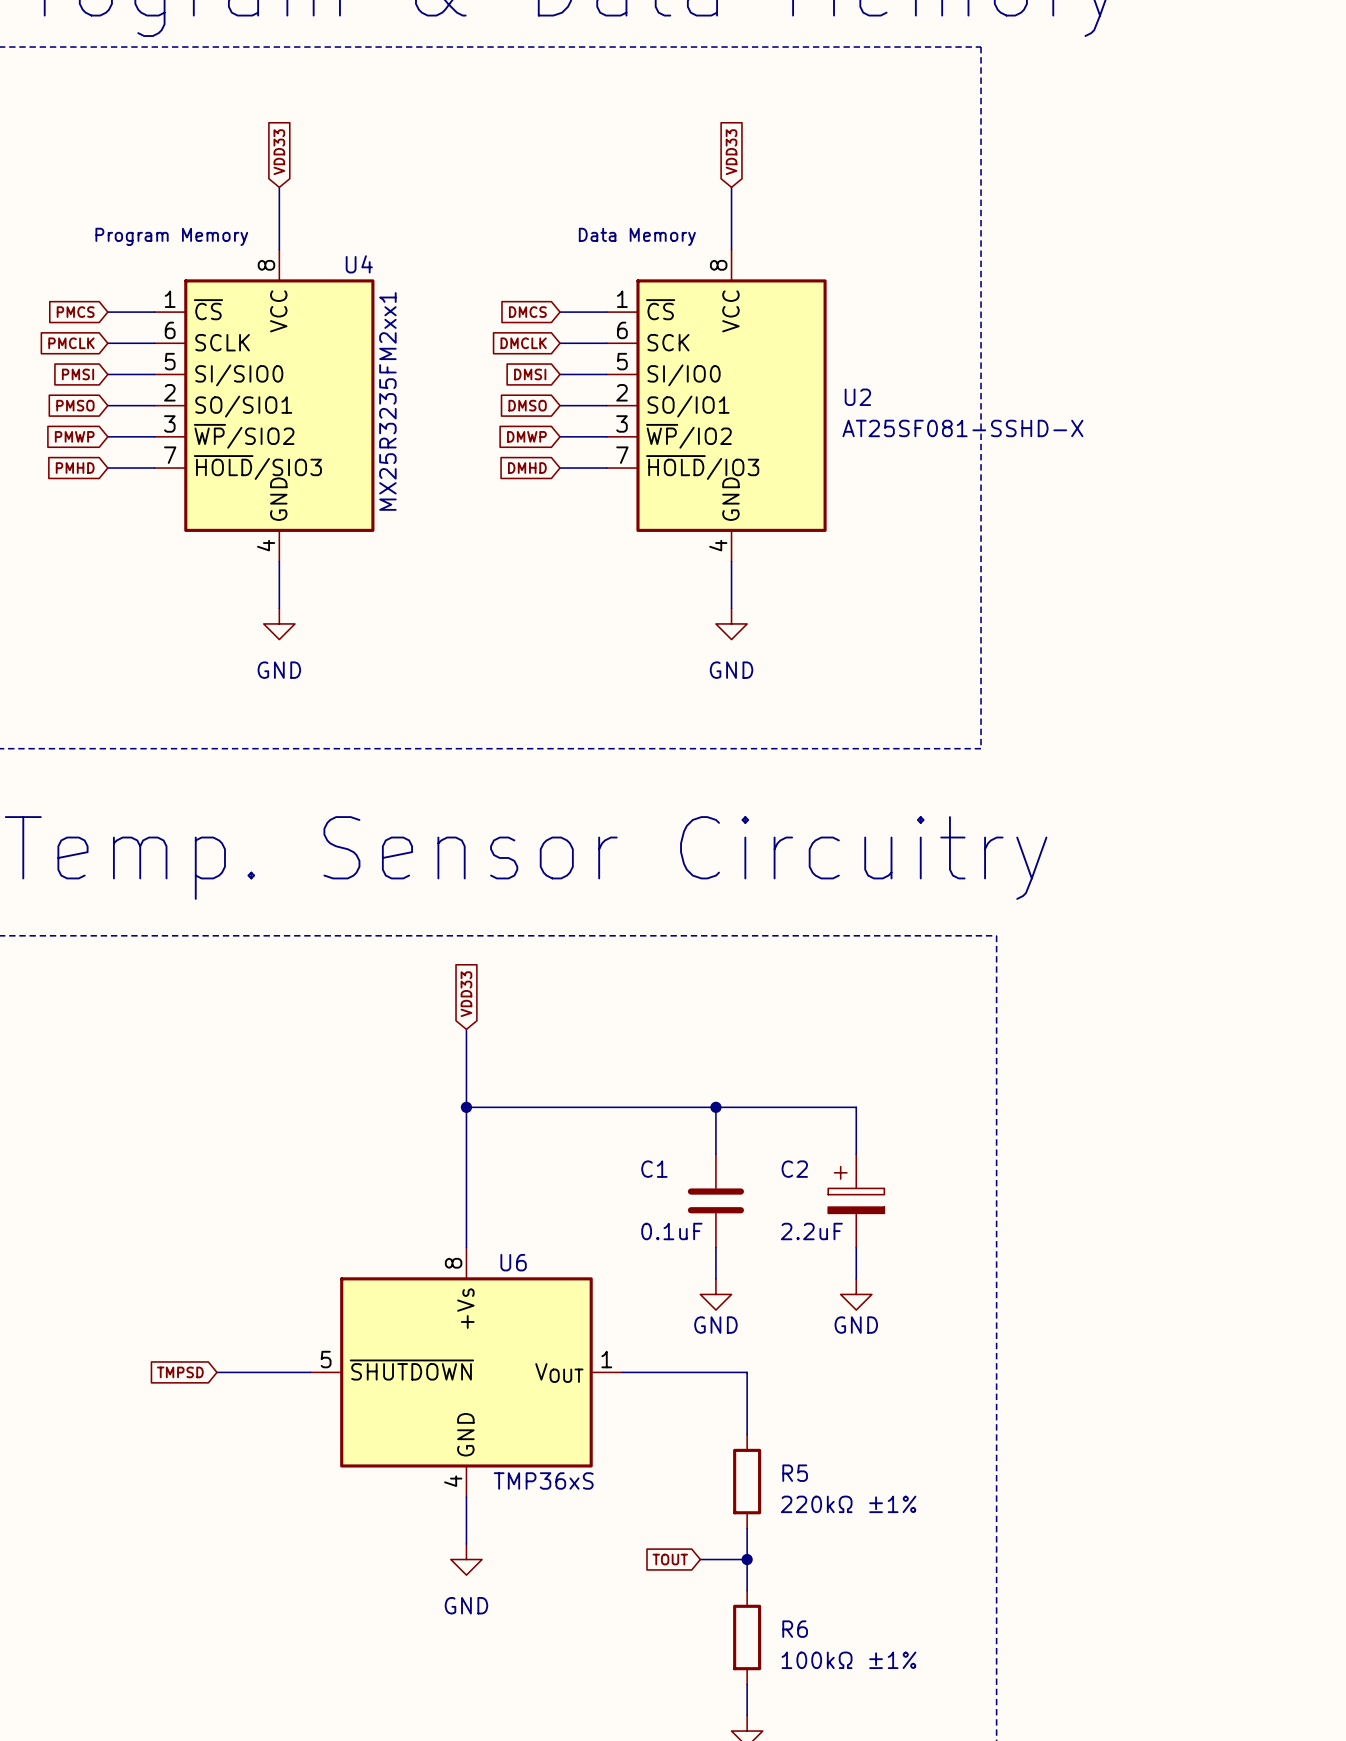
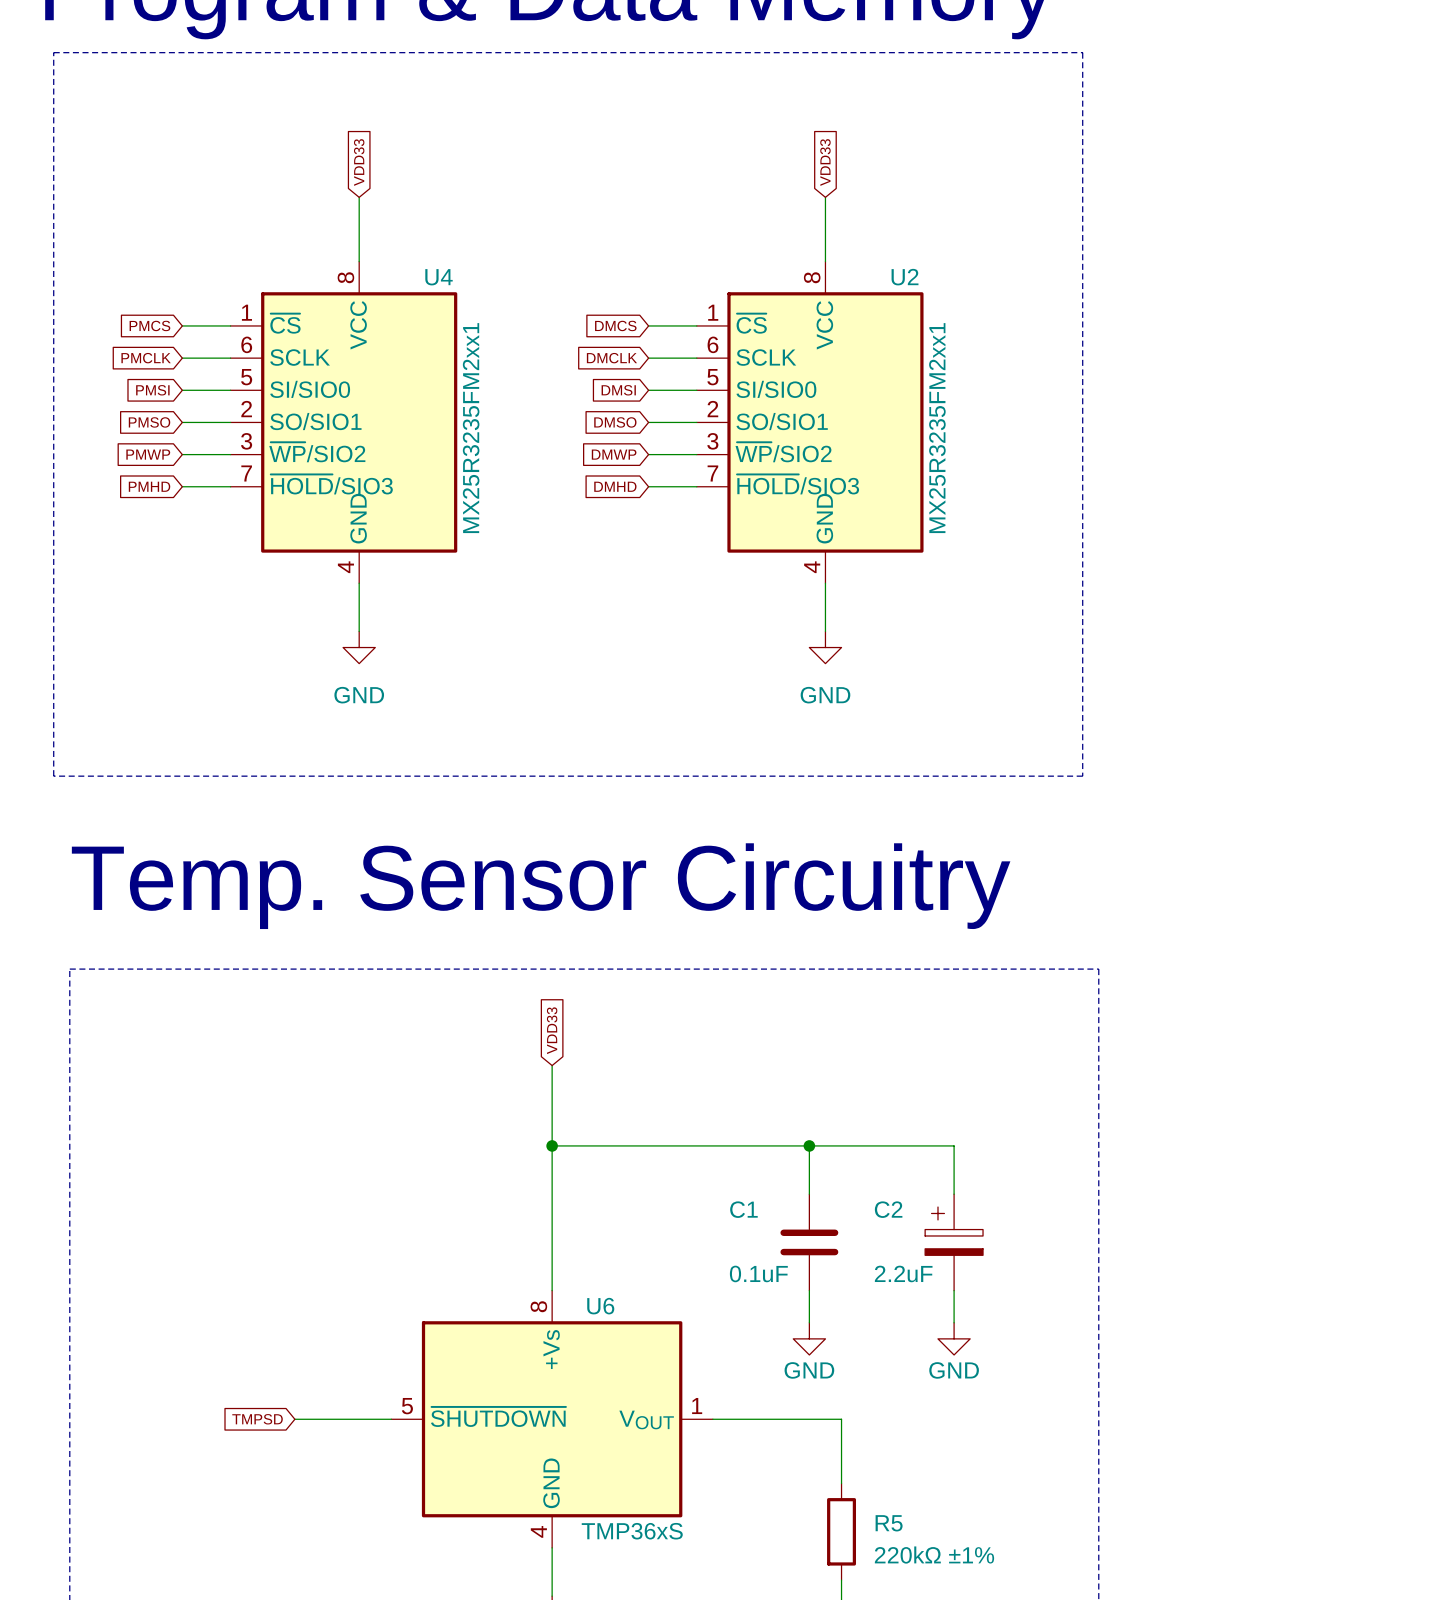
text: Program Memory (171, 236) -> none
text: Data Memory (637, 236) -> none
U2 pin name: SCK (668, 342) -> SCLK (766, 357)
U2 pin name: SI/IO0 (684, 375) -> SI/SIO0 (776, 389)
U2 name position: U2 (857, 397) -> U2 (905, 277)
U2 pin name: SO/IO1 (688, 406) -> SO/SIO1 (782, 421)
U2 value: AT25SF081-SSHD-X (962, 428) -> MX25R3235FM2xx1 (937, 428)
U2 pin name: ~{WP}/IO2 (688, 436) -> ~{WP}/SIO2 (783, 452)
U2 pin name: ~{HOLD}/IO3 (702, 467) -> ~{HOLD}/SIO3 (798, 484)

